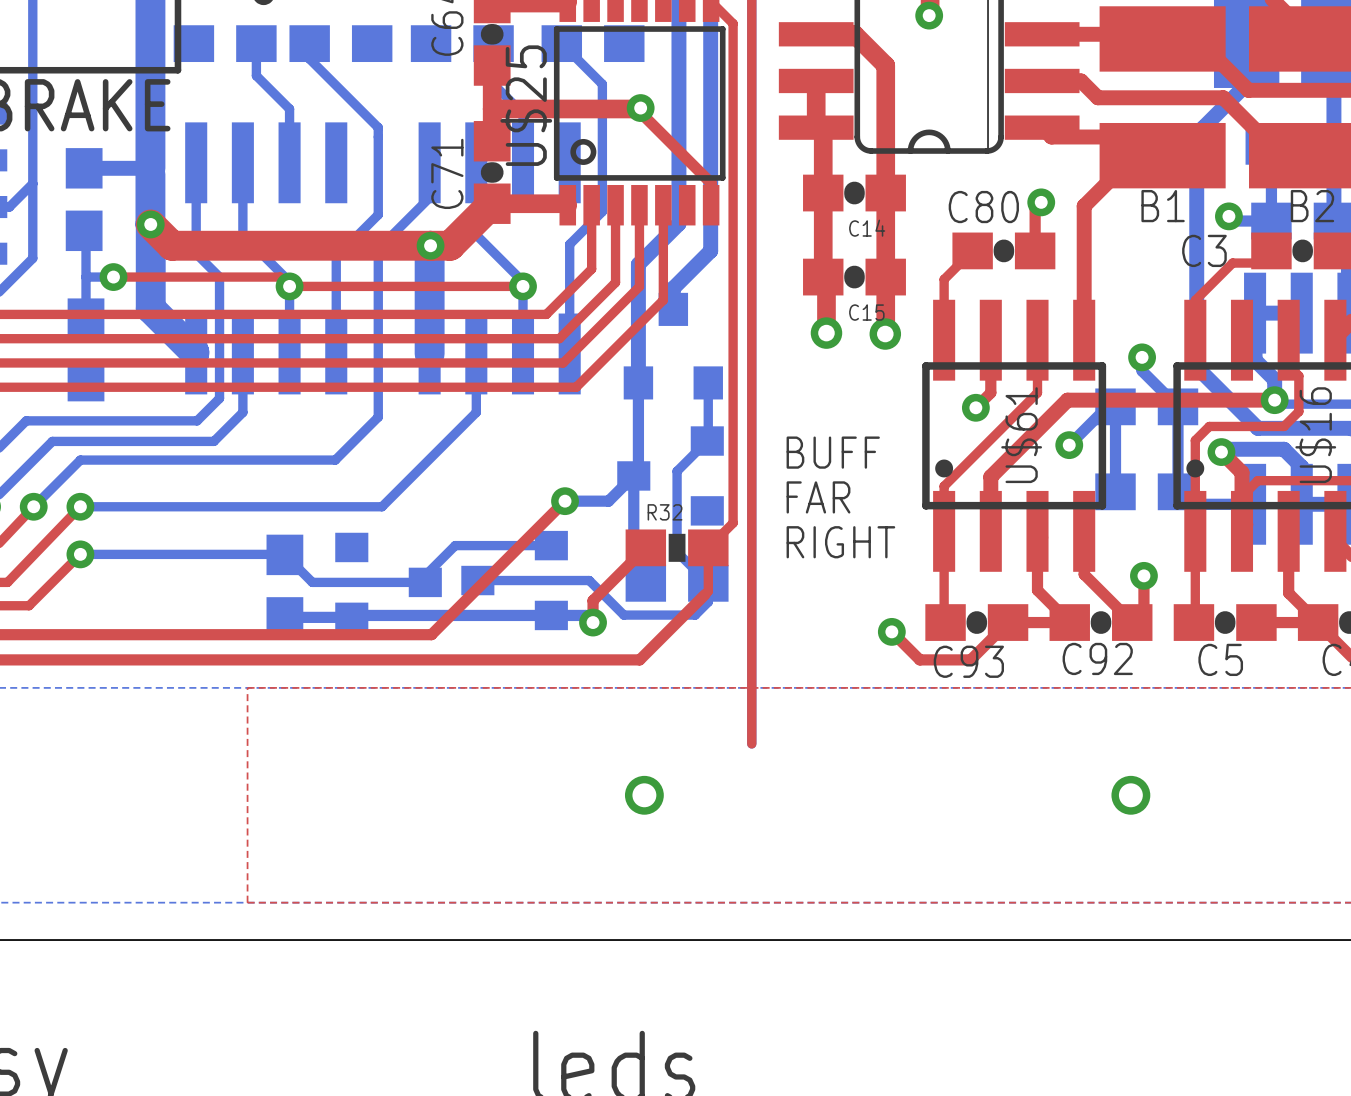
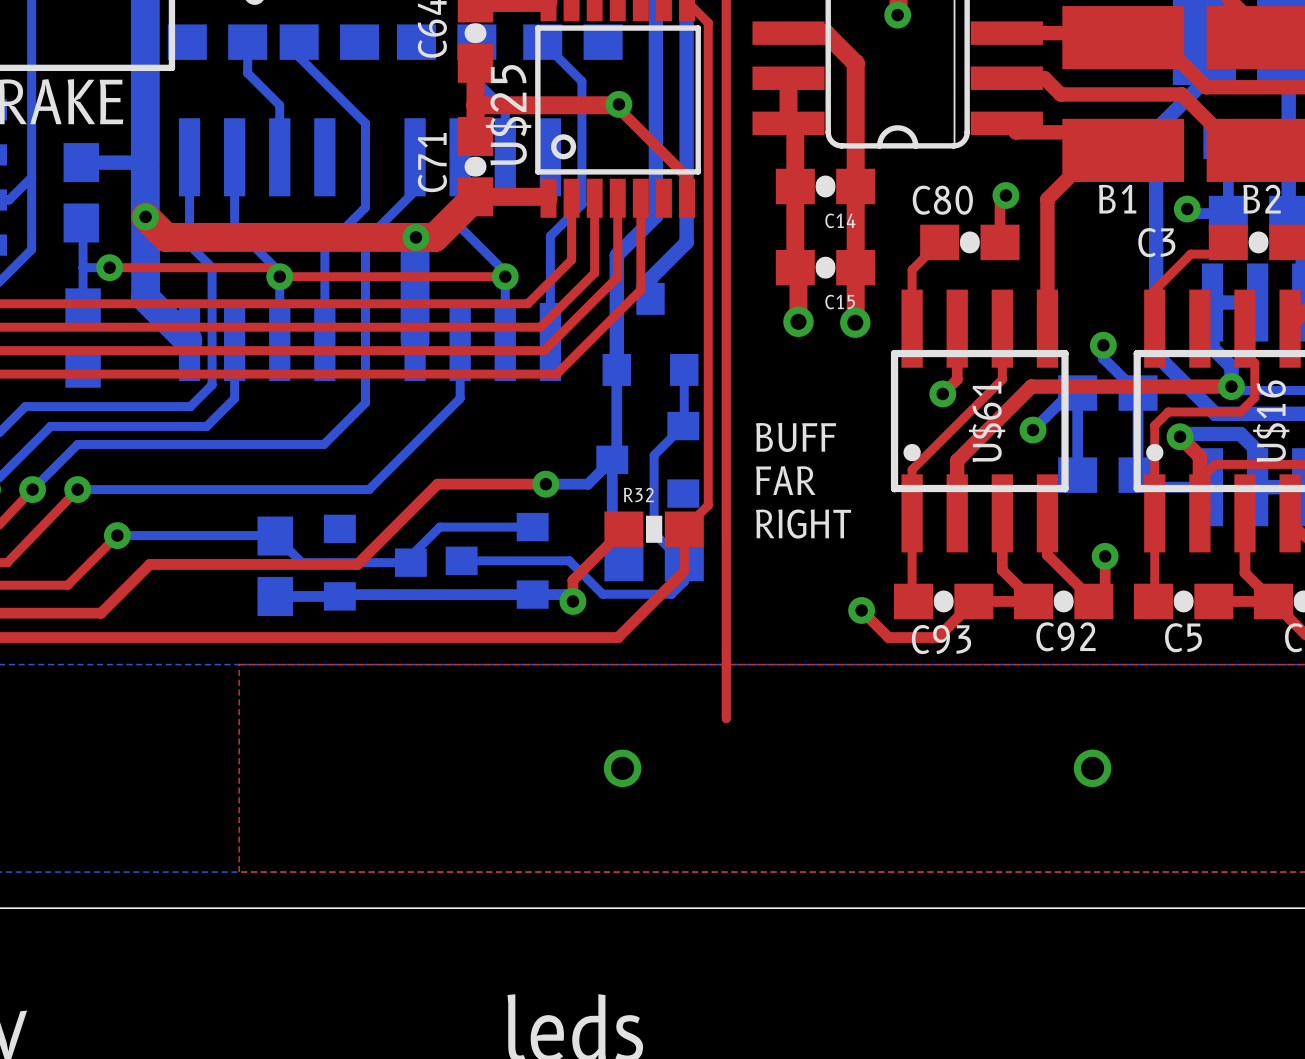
top track: (565, 501) (431, 634) (104, 634) -> (545, 484) (437, 484) (357, 564) (149, 564) (101, 613)
top track: (80, 554) (29, 605) -> (117, 535) (67, 585) (28, 585)
bottom track: (80, 554) (121, 554) -> none
via position: (80, 554) -> (117, 535)

